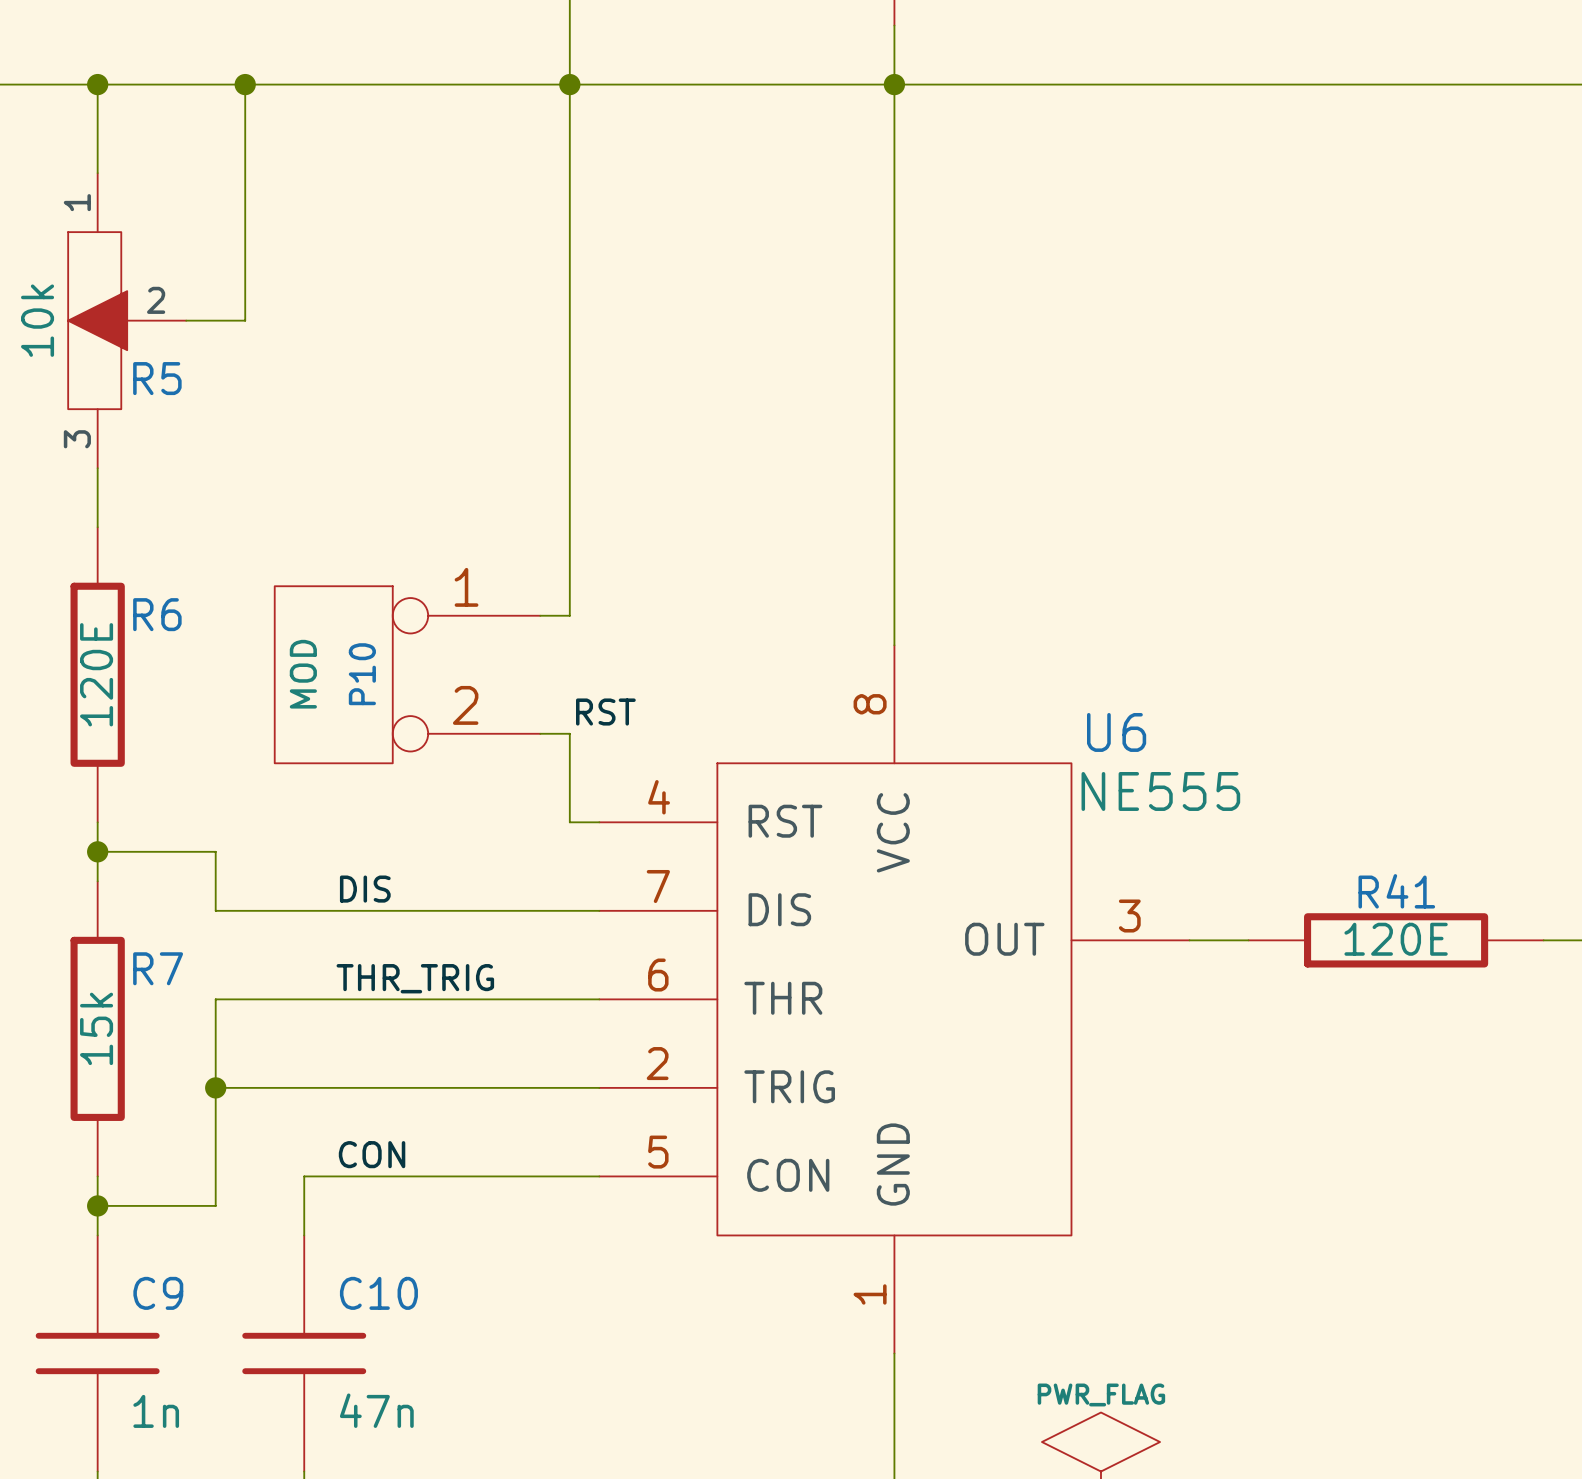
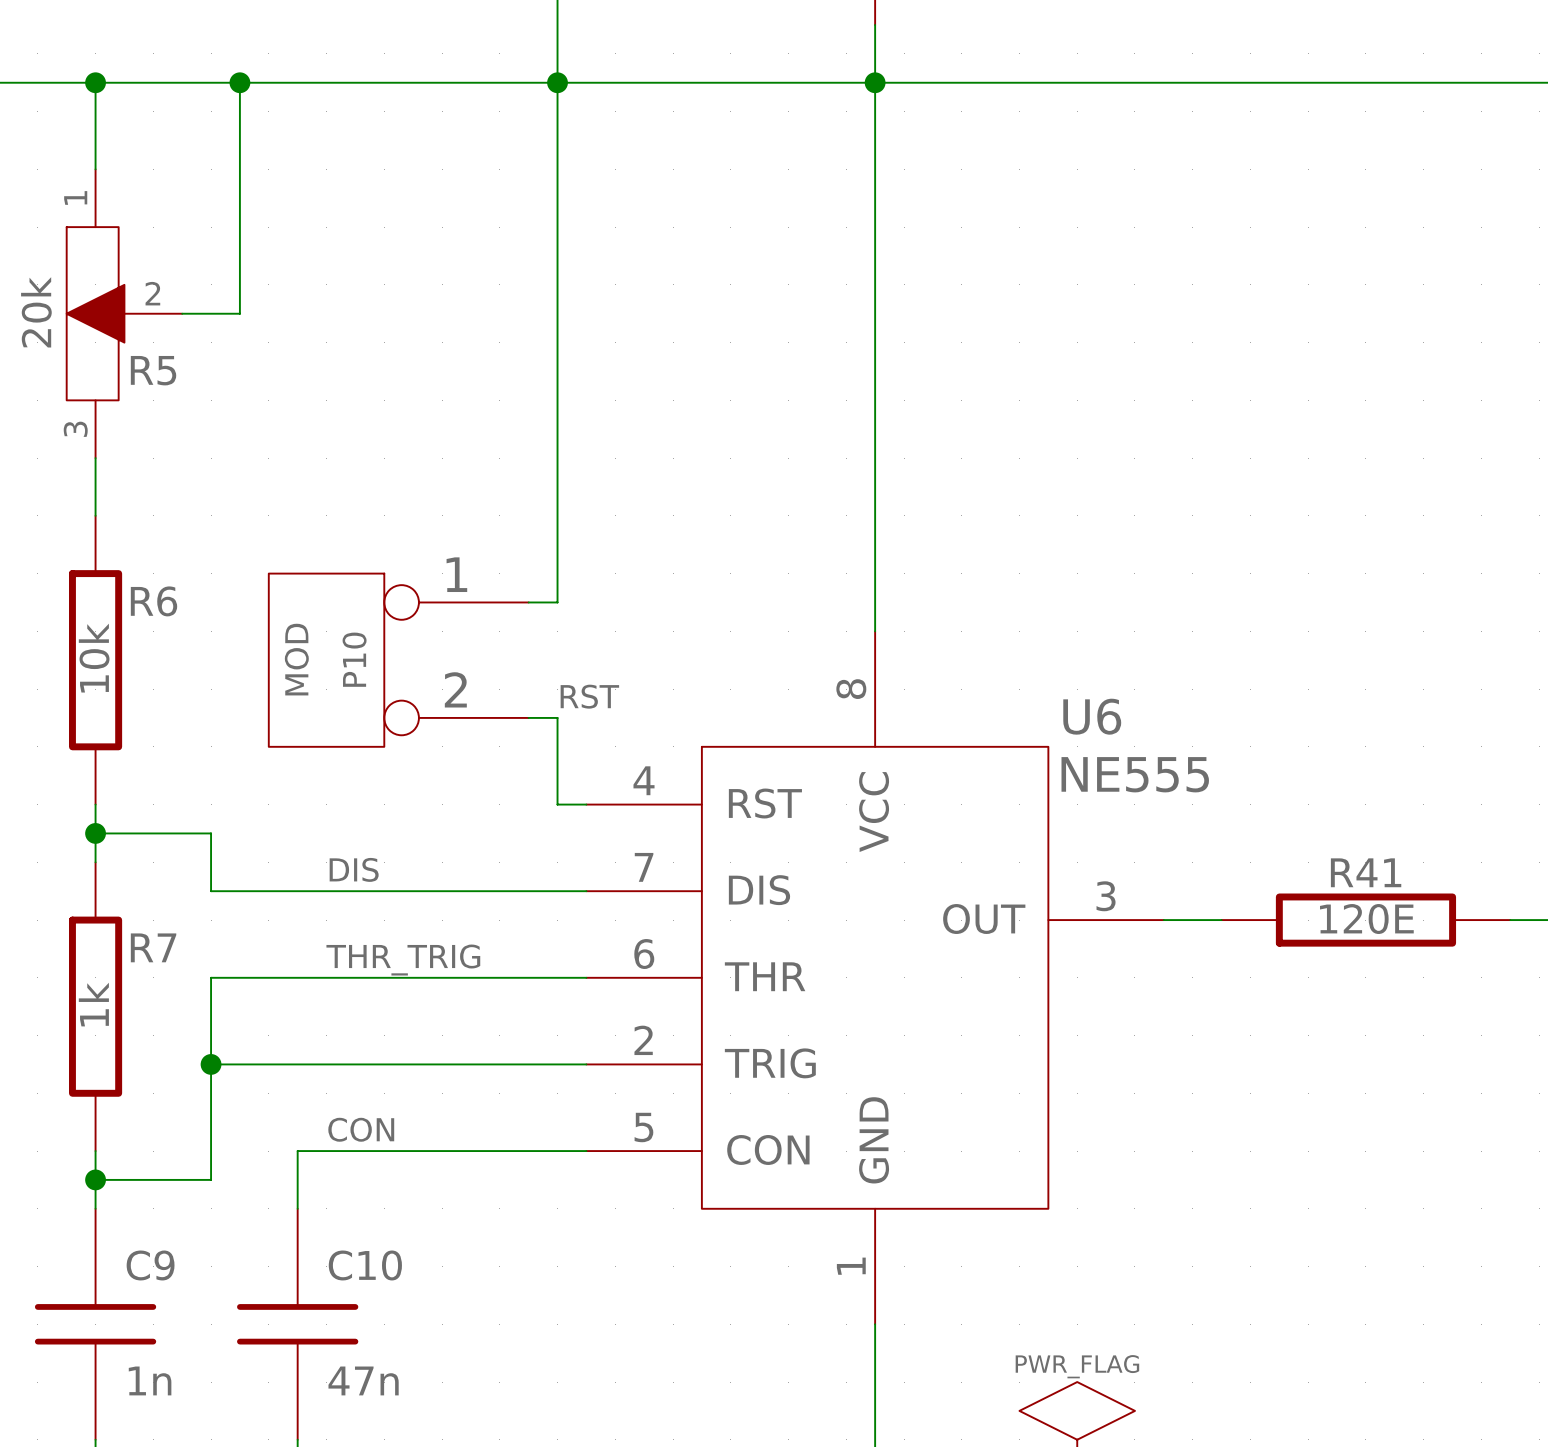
R5 value: 10k (37, 320) -> 20k (36, 312)
R6 value: 120E (96, 674) -> 10k (94, 658)
R7 value: 15k (96, 1028) -> 1k (93, 1004)

